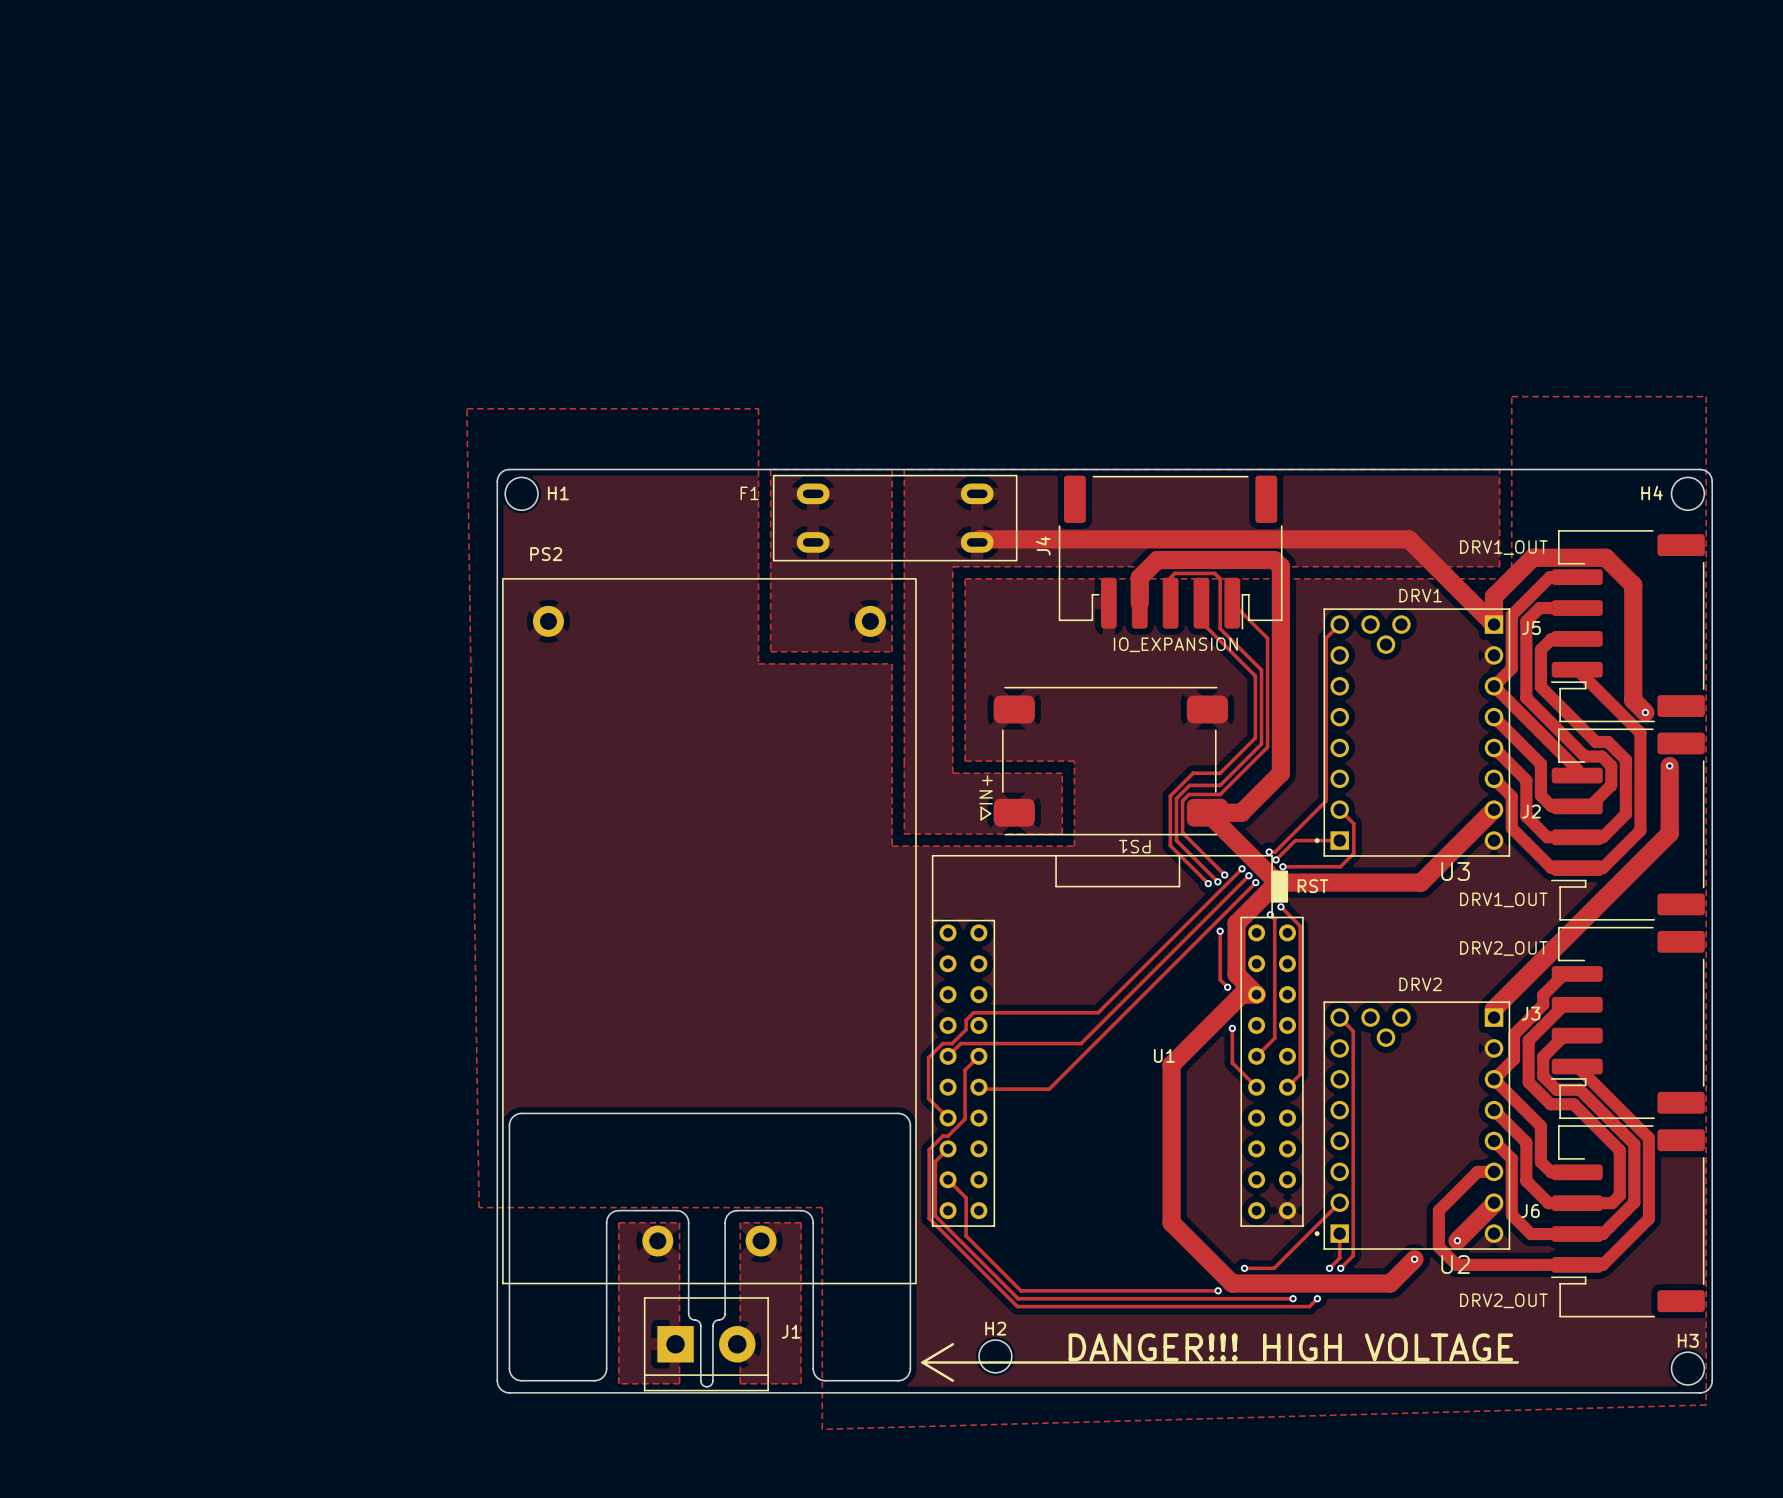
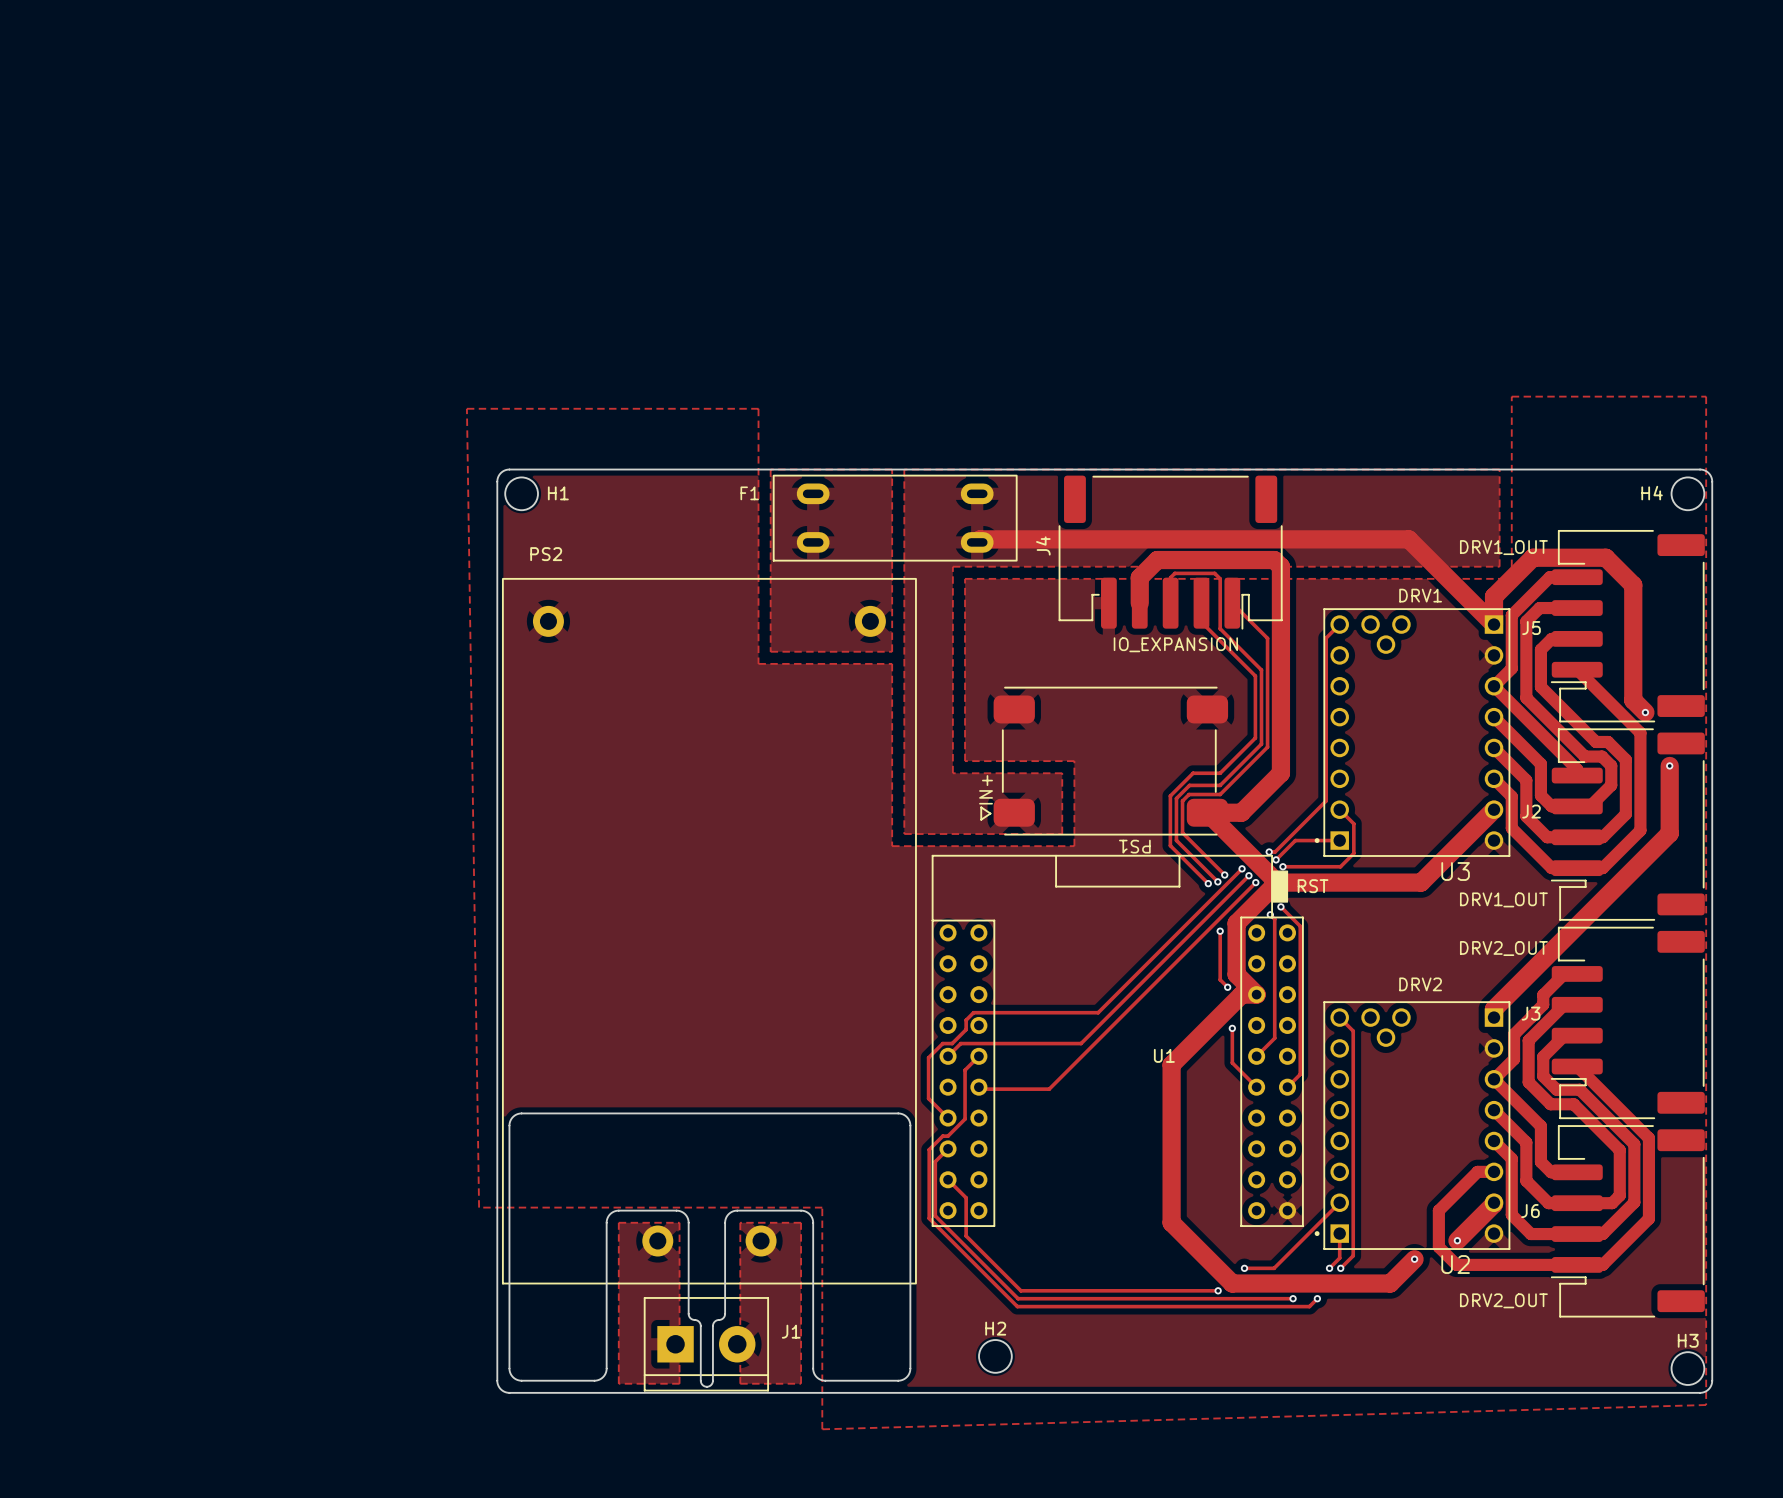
line: (952, 1344) (922, 1362) -> none
text: DANGER!!! HIGH VOLTAGE (1290, 1347) -> none
line: (922, 1362) (952, 1380) -> none
line: (922, 1362) (1517, 1362) -> none

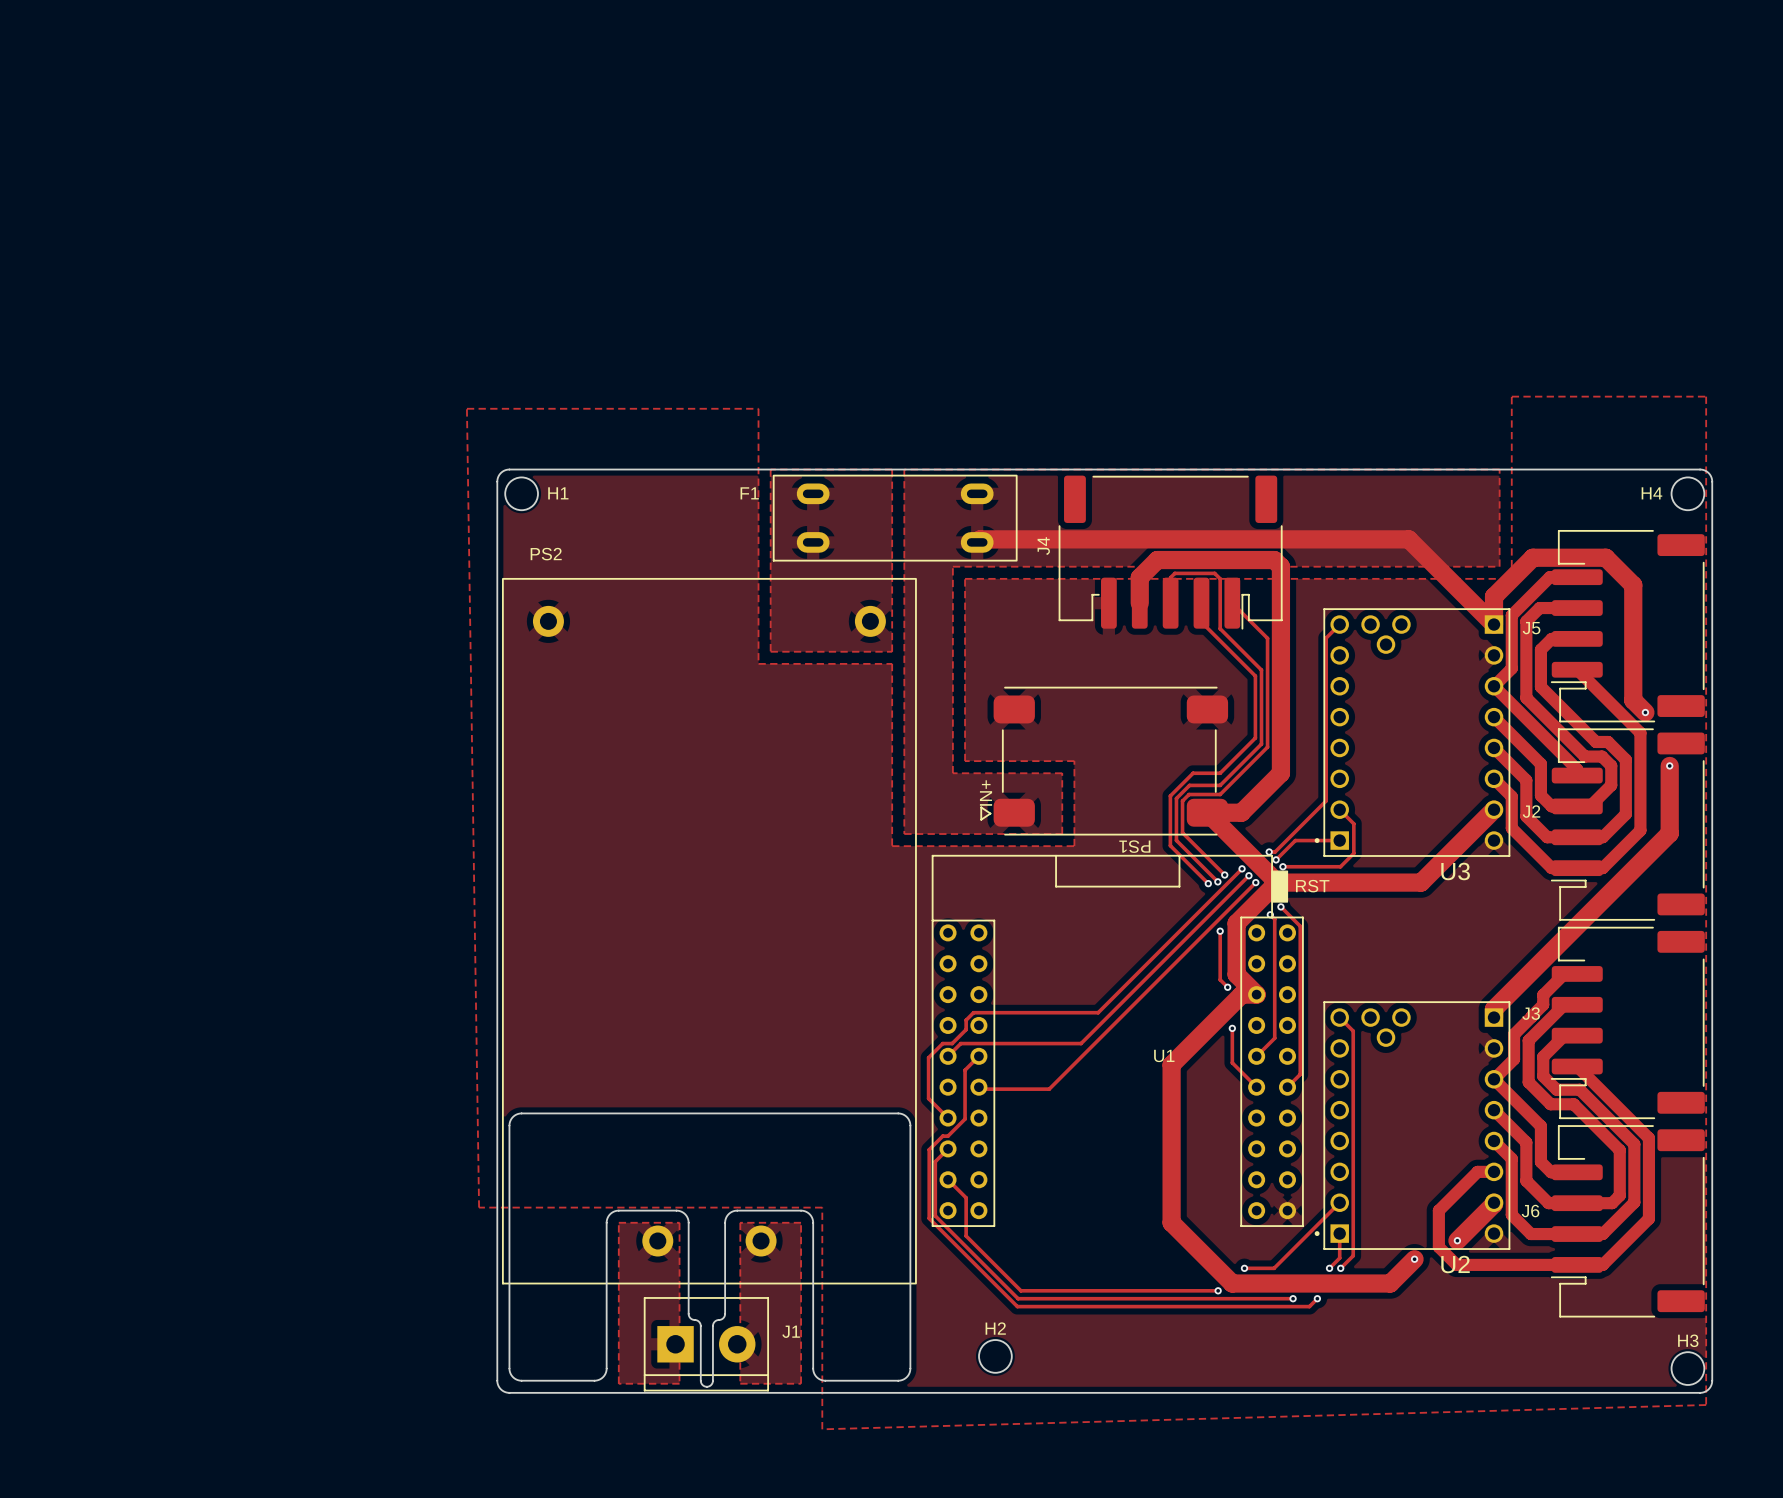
text: DRV1_OUT (1503, 547) -> none
text: DRV1 (1420, 595) -> none
text: IO_EXPANSION (1175, 644) -> none
text: DRV1_OUT (1503, 899) -> none
text: DRV2_OUT (1503, 948) -> none
text: DRV2 (1420, 984) -> none
text: DRV2_OUT (1503, 1300) -> none

